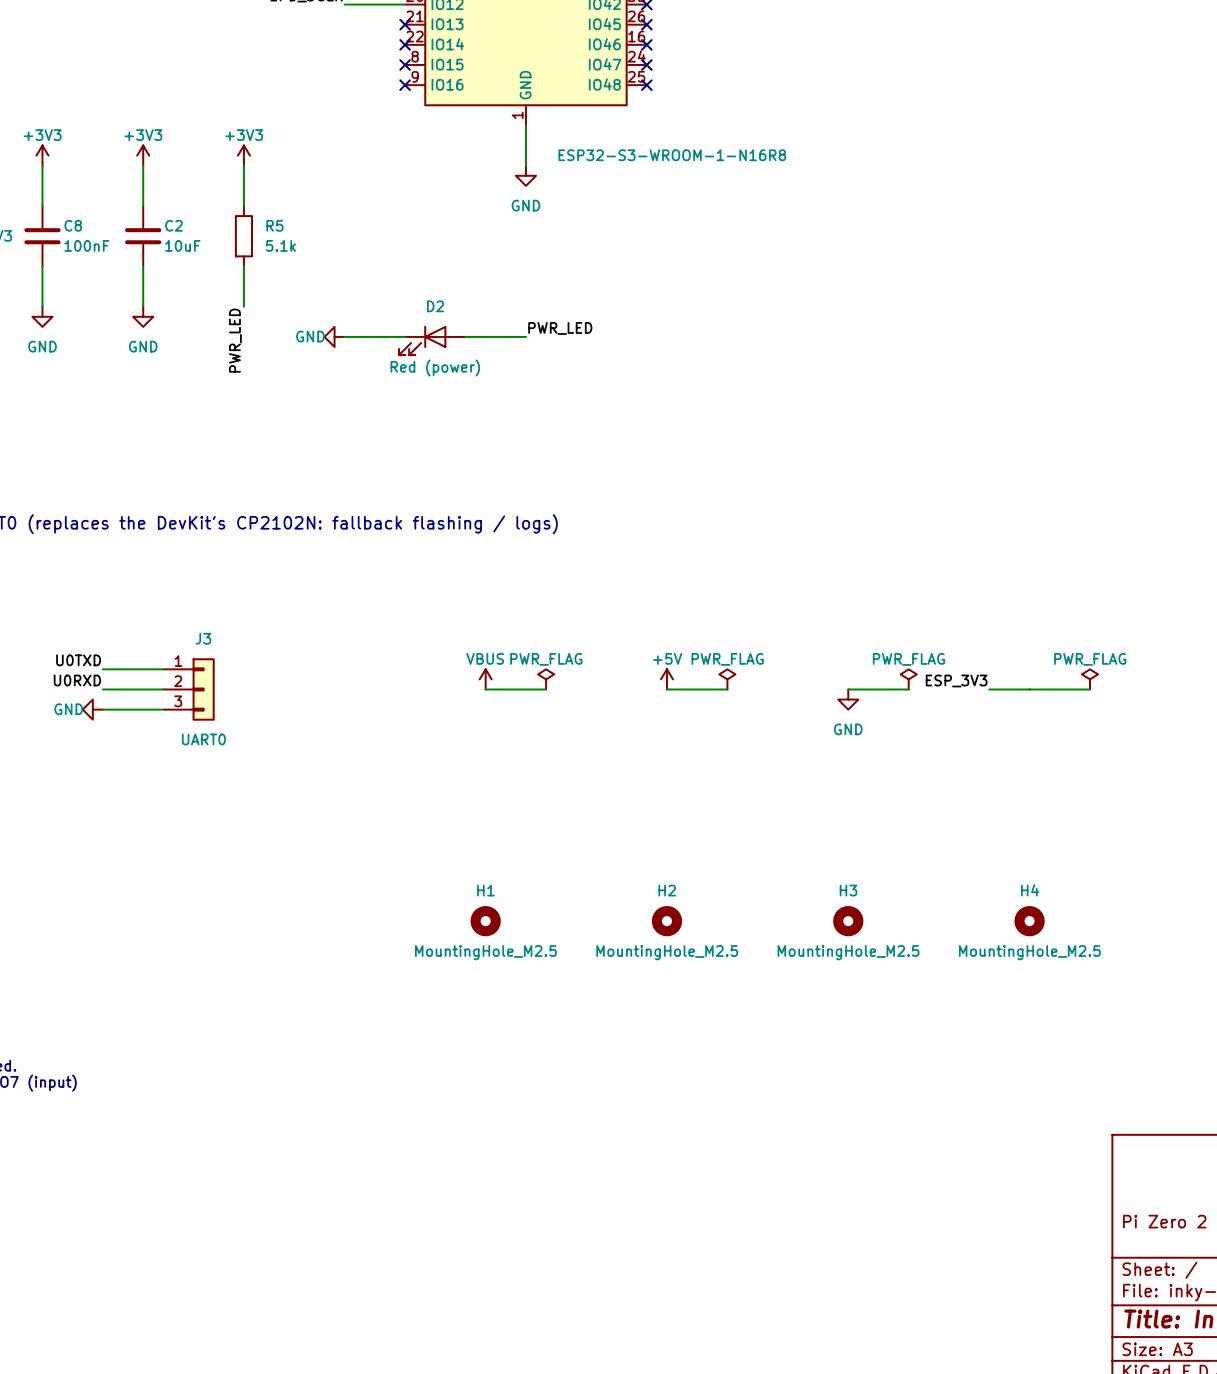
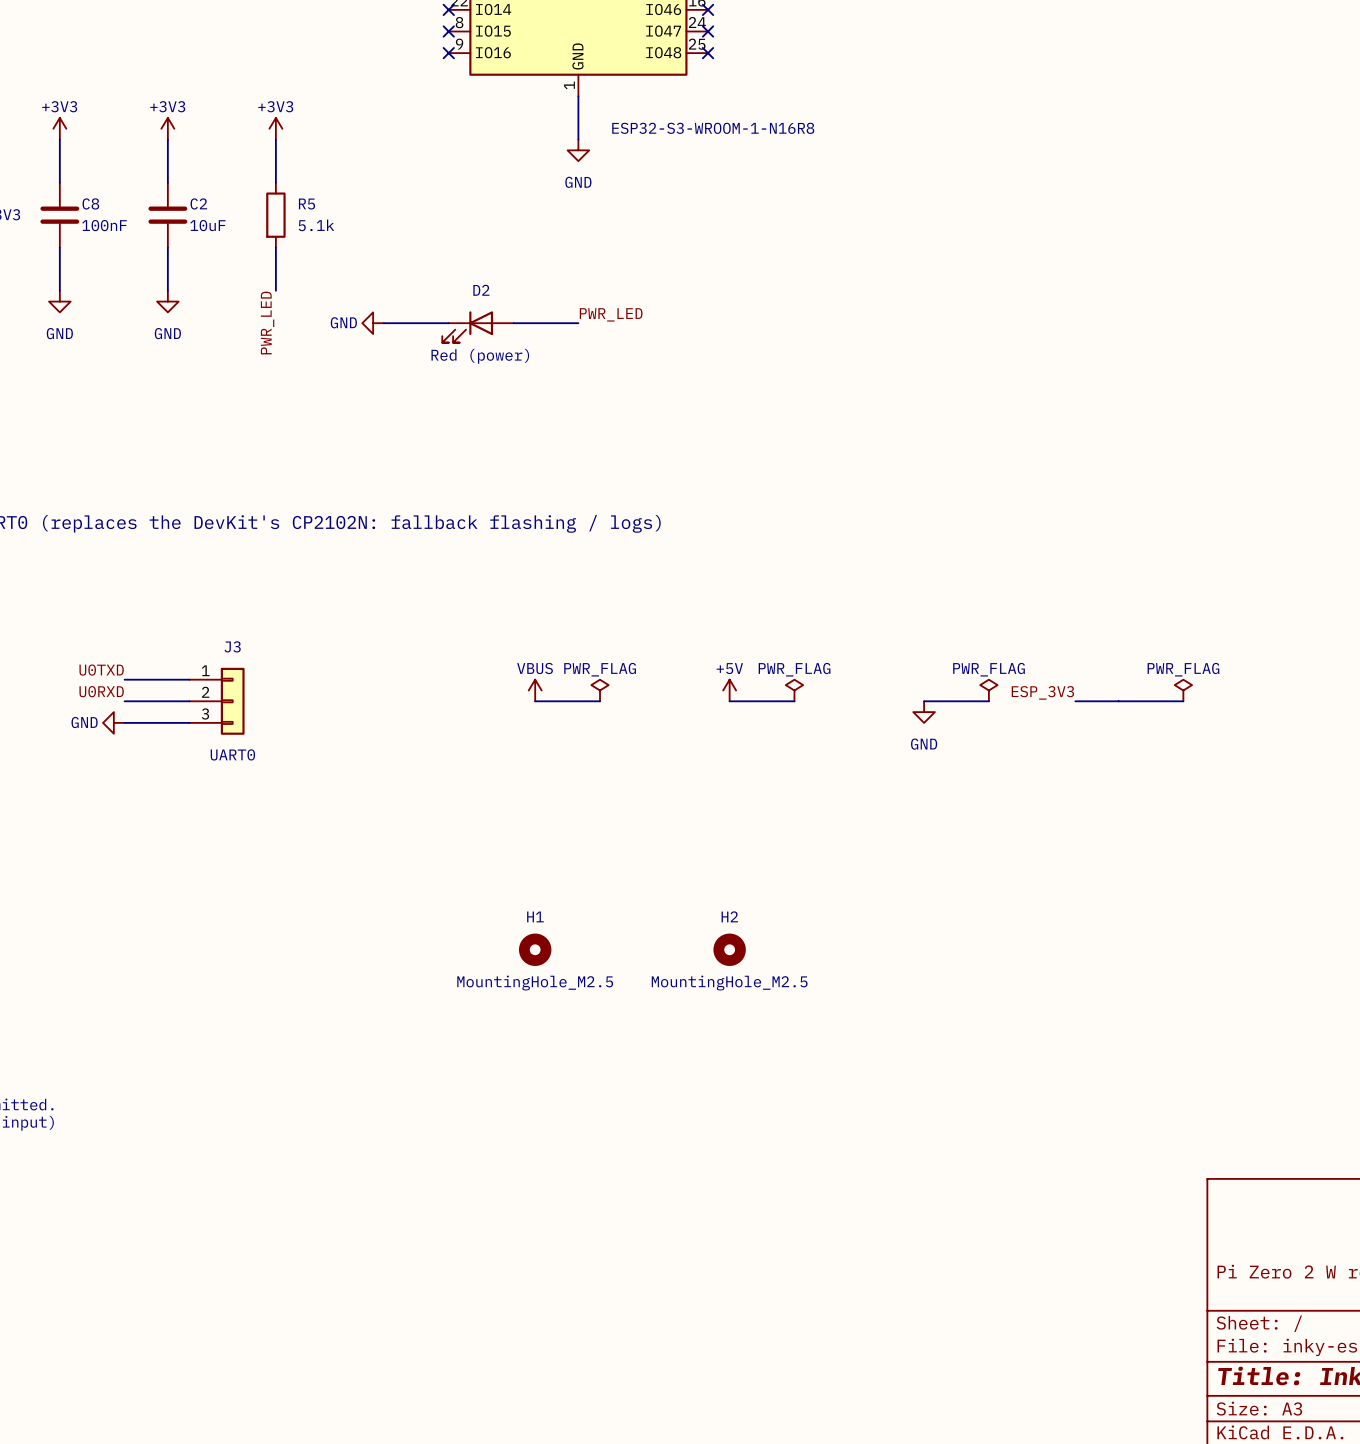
H3: MountingHole_M2.5 (848, 921) -> none
H4: MountingHole_M2.5 (1029, 921) -> none

